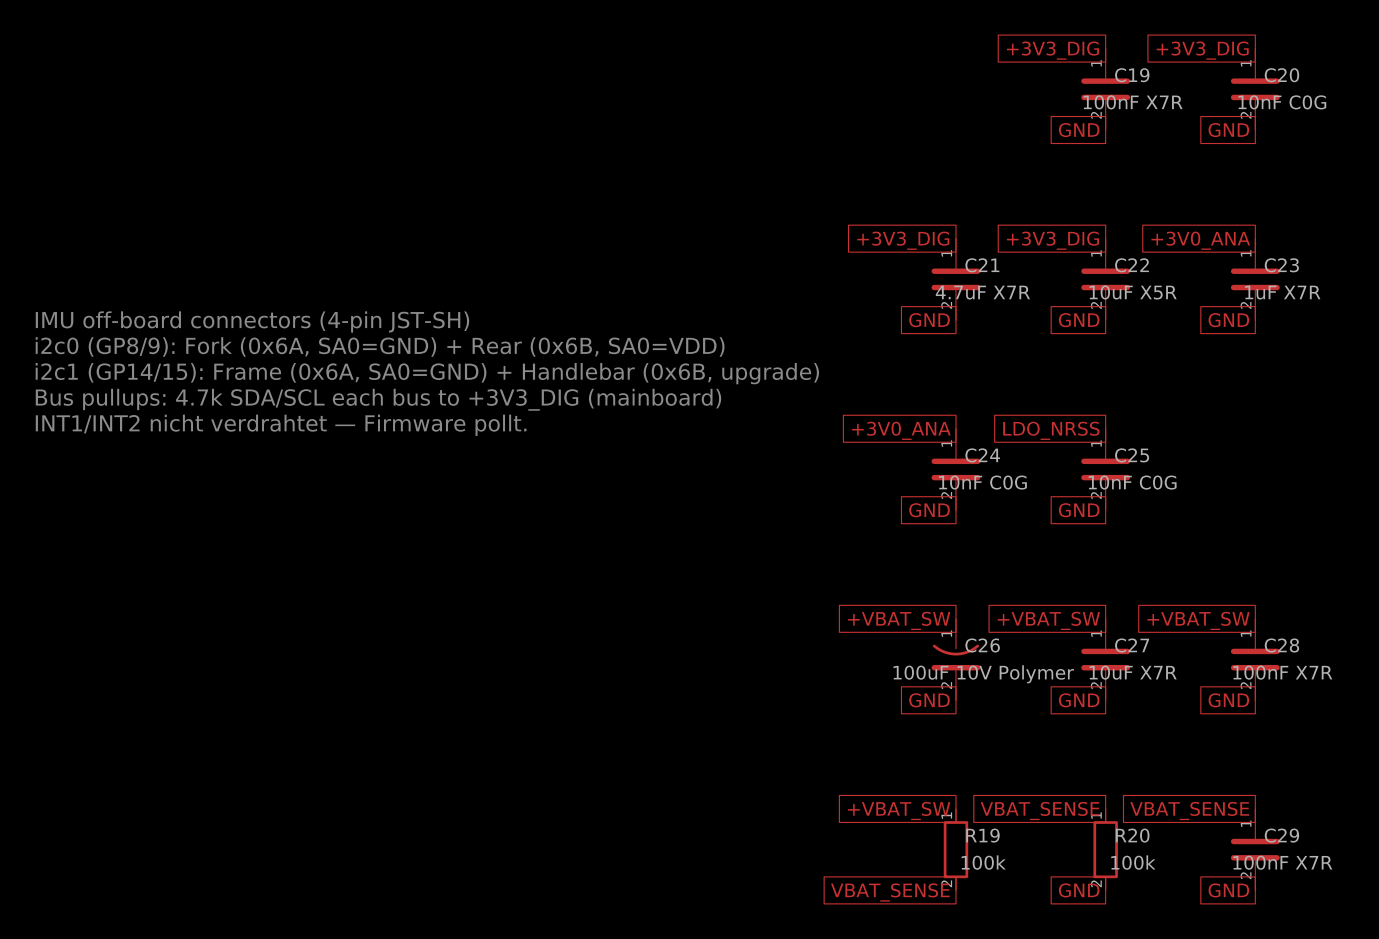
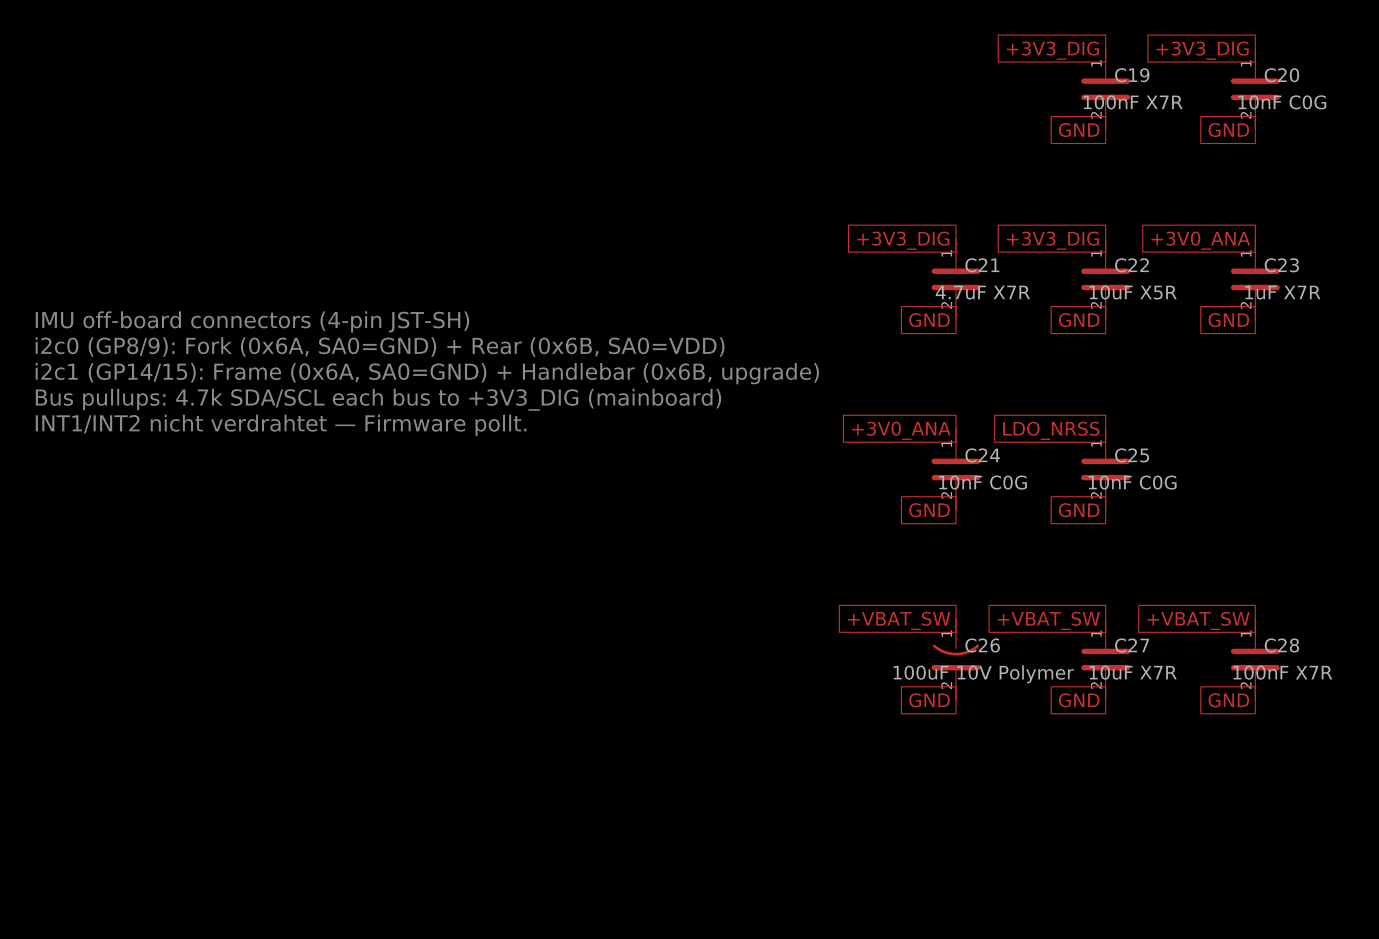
global label: +VBAT_SW (899, 811) -> none
global label: VBAT_SENSE (1040, 811) -> none
global label: VBAT_SENSE (1189, 811) -> none
R19: 100k (955, 849) -> none
R20: 100k (1105, 849) -> none
C29: 100nF X7R (1255, 849) -> none
global label: GND (1079, 890) -> none
global label: GND (1228, 890) -> none
global label: VBAT_SENSE (890, 892) -> none

